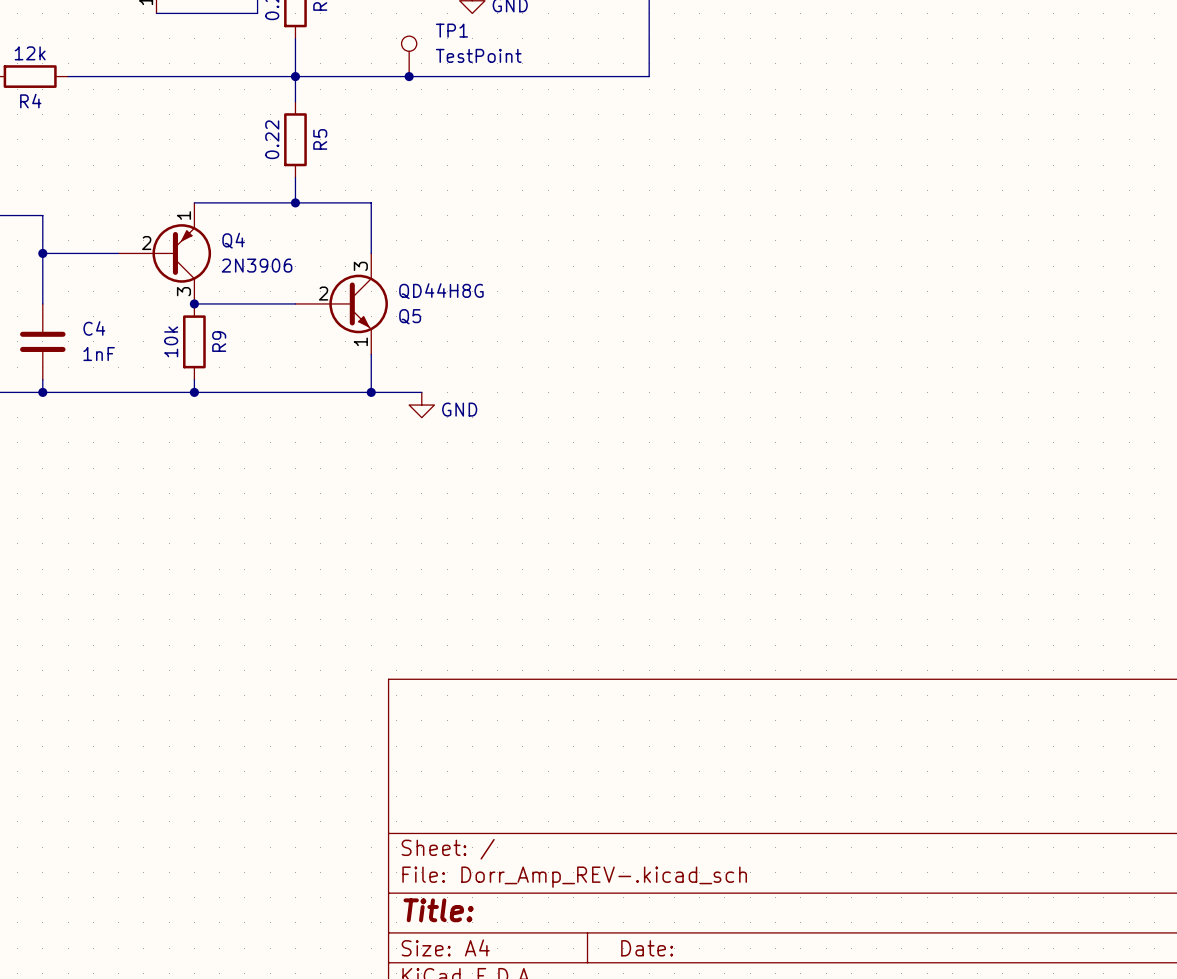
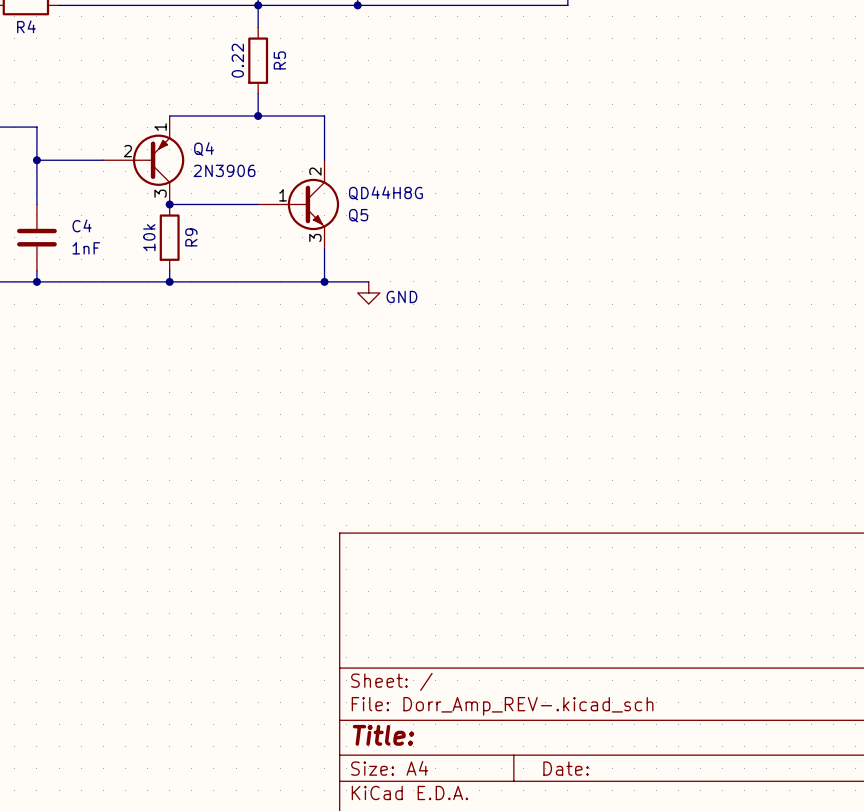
Q5 pin number: 3 (360, 266) -> 2 (315, 171)
Q5 pin number: 2 (323, 293) -> 1 (283, 195)
Q5 pin number: 1 (360, 341) -> 3 (315, 237)

